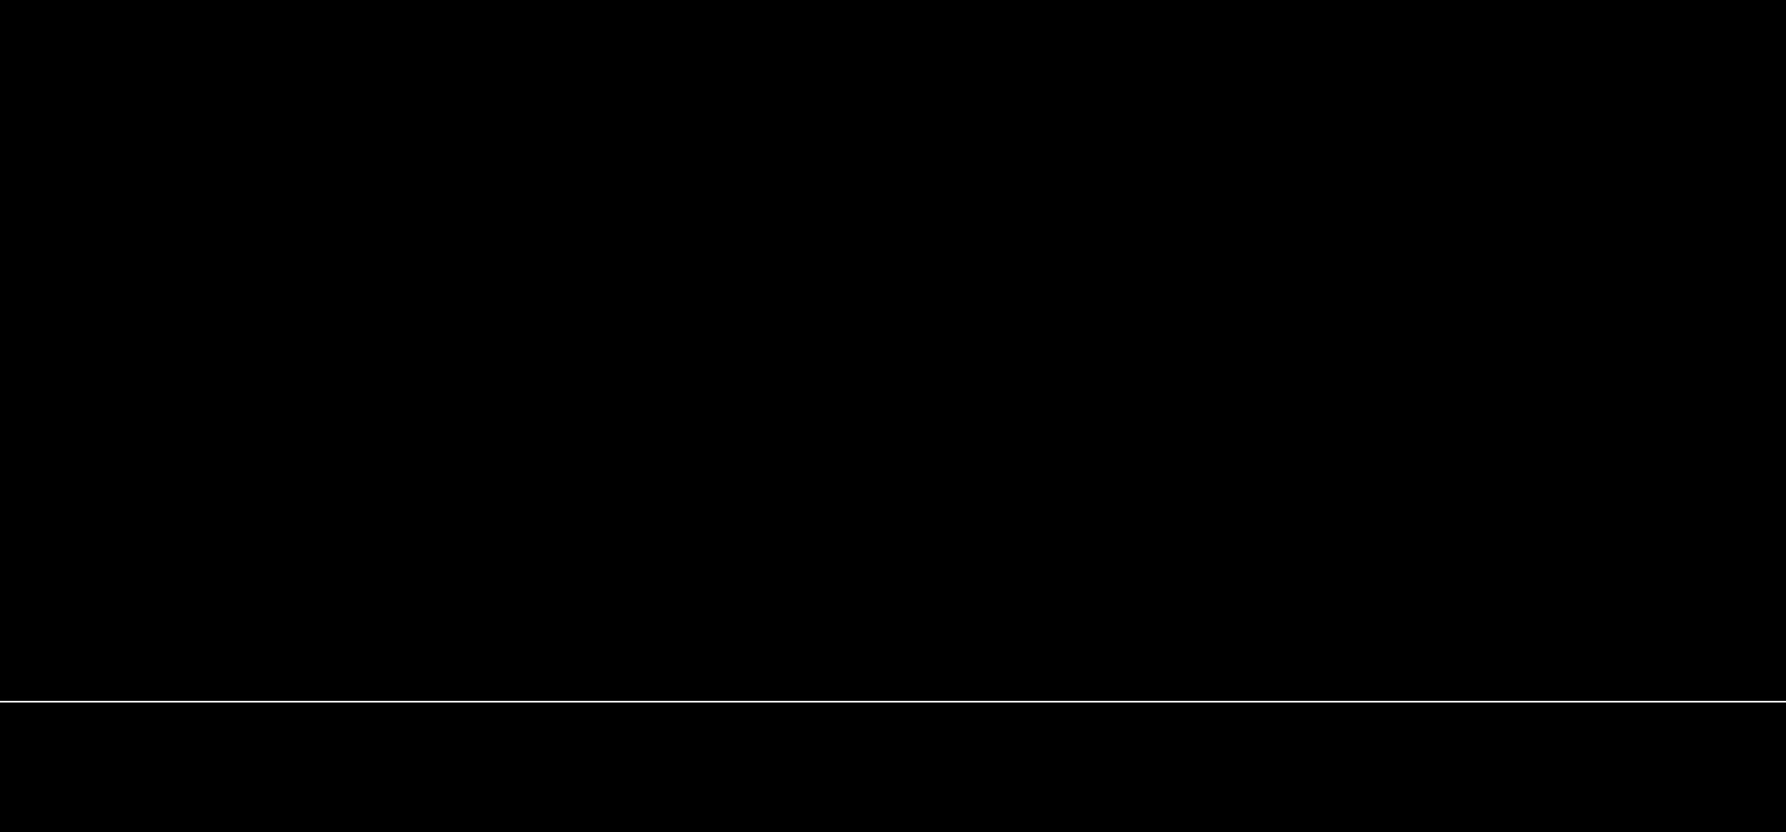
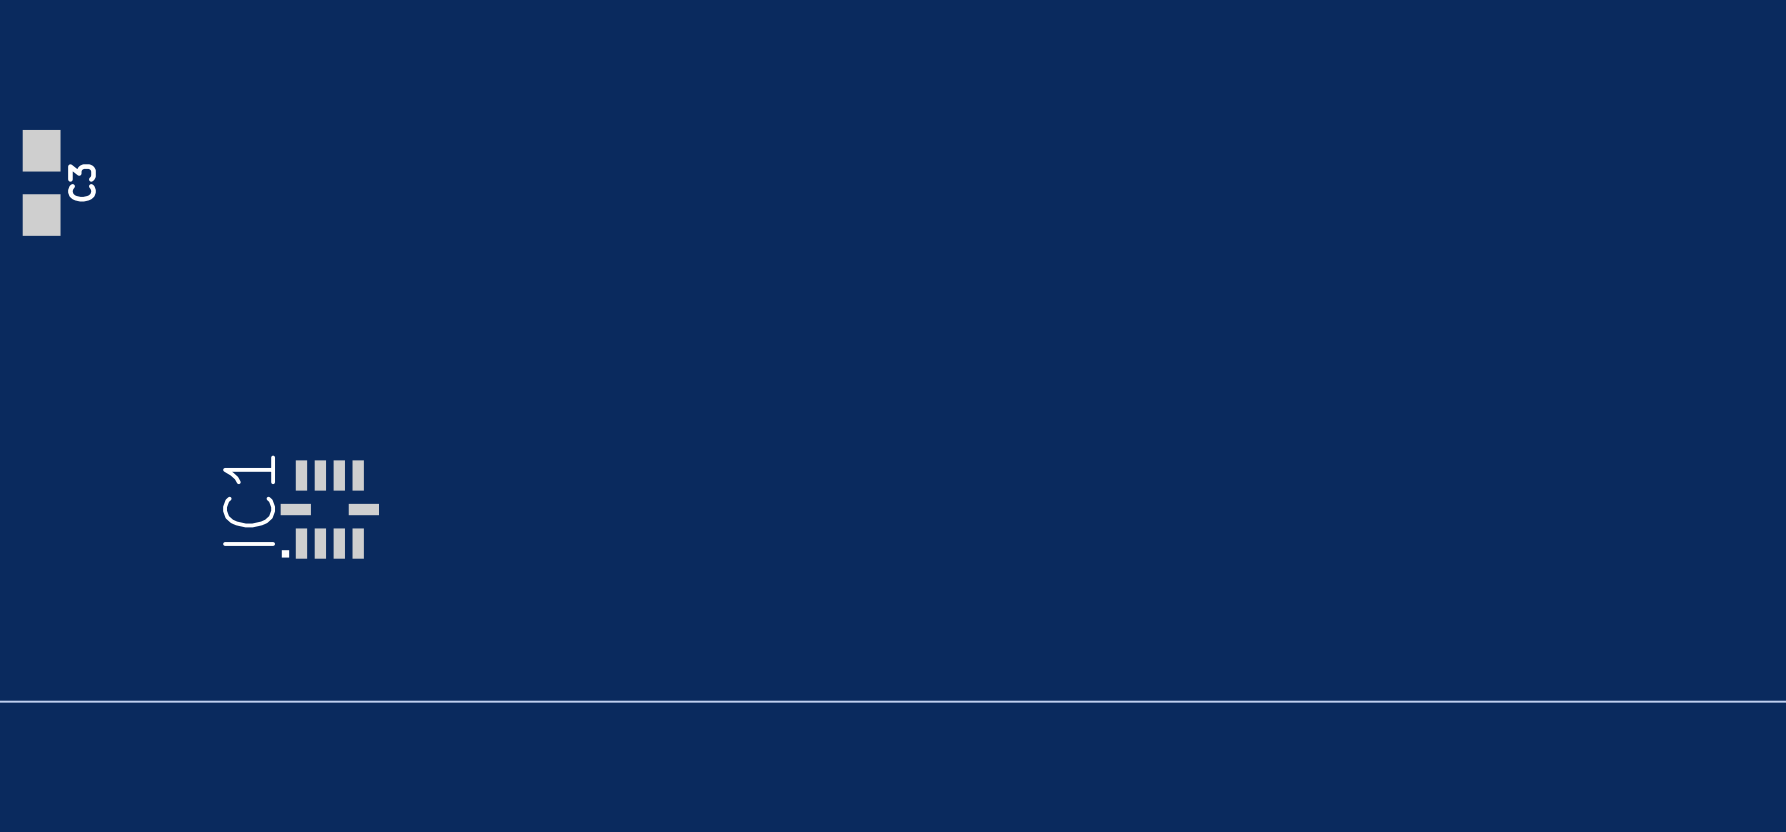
C3: none -> (41, 182)
IC1: none -> (329, 509)

